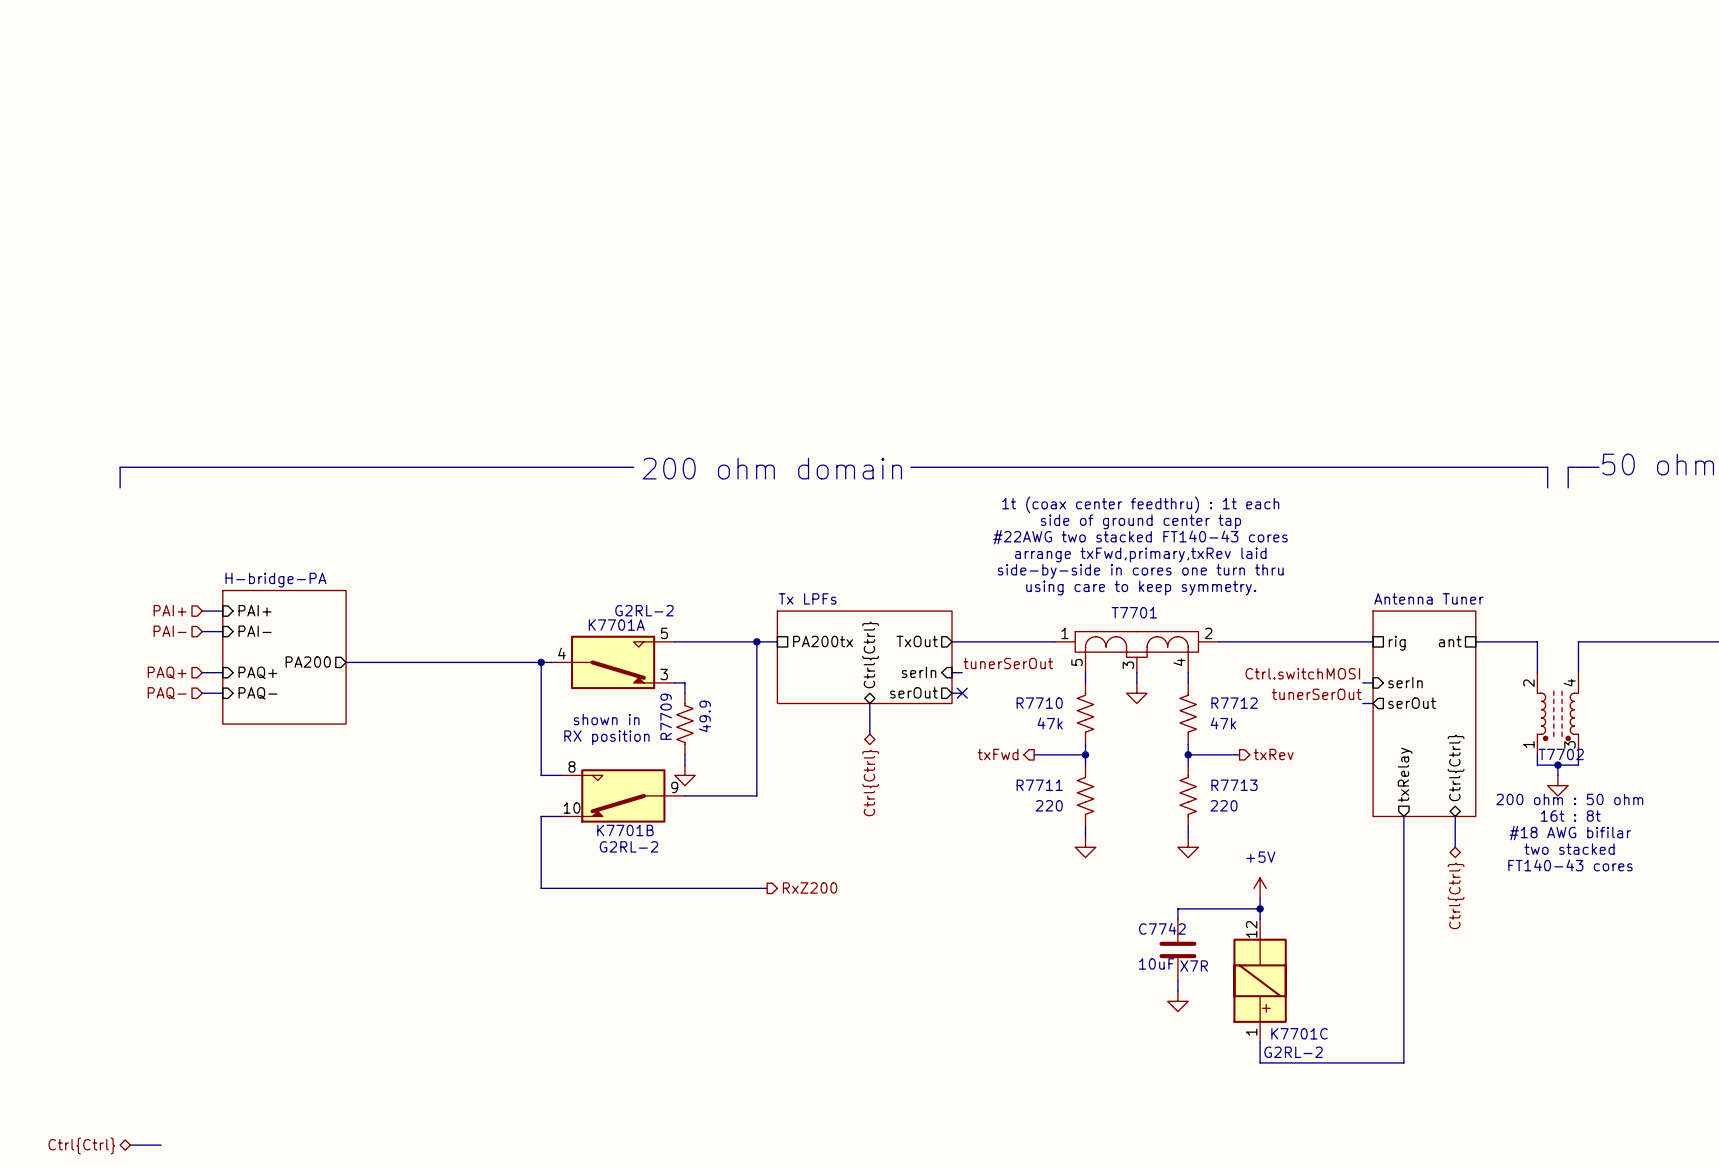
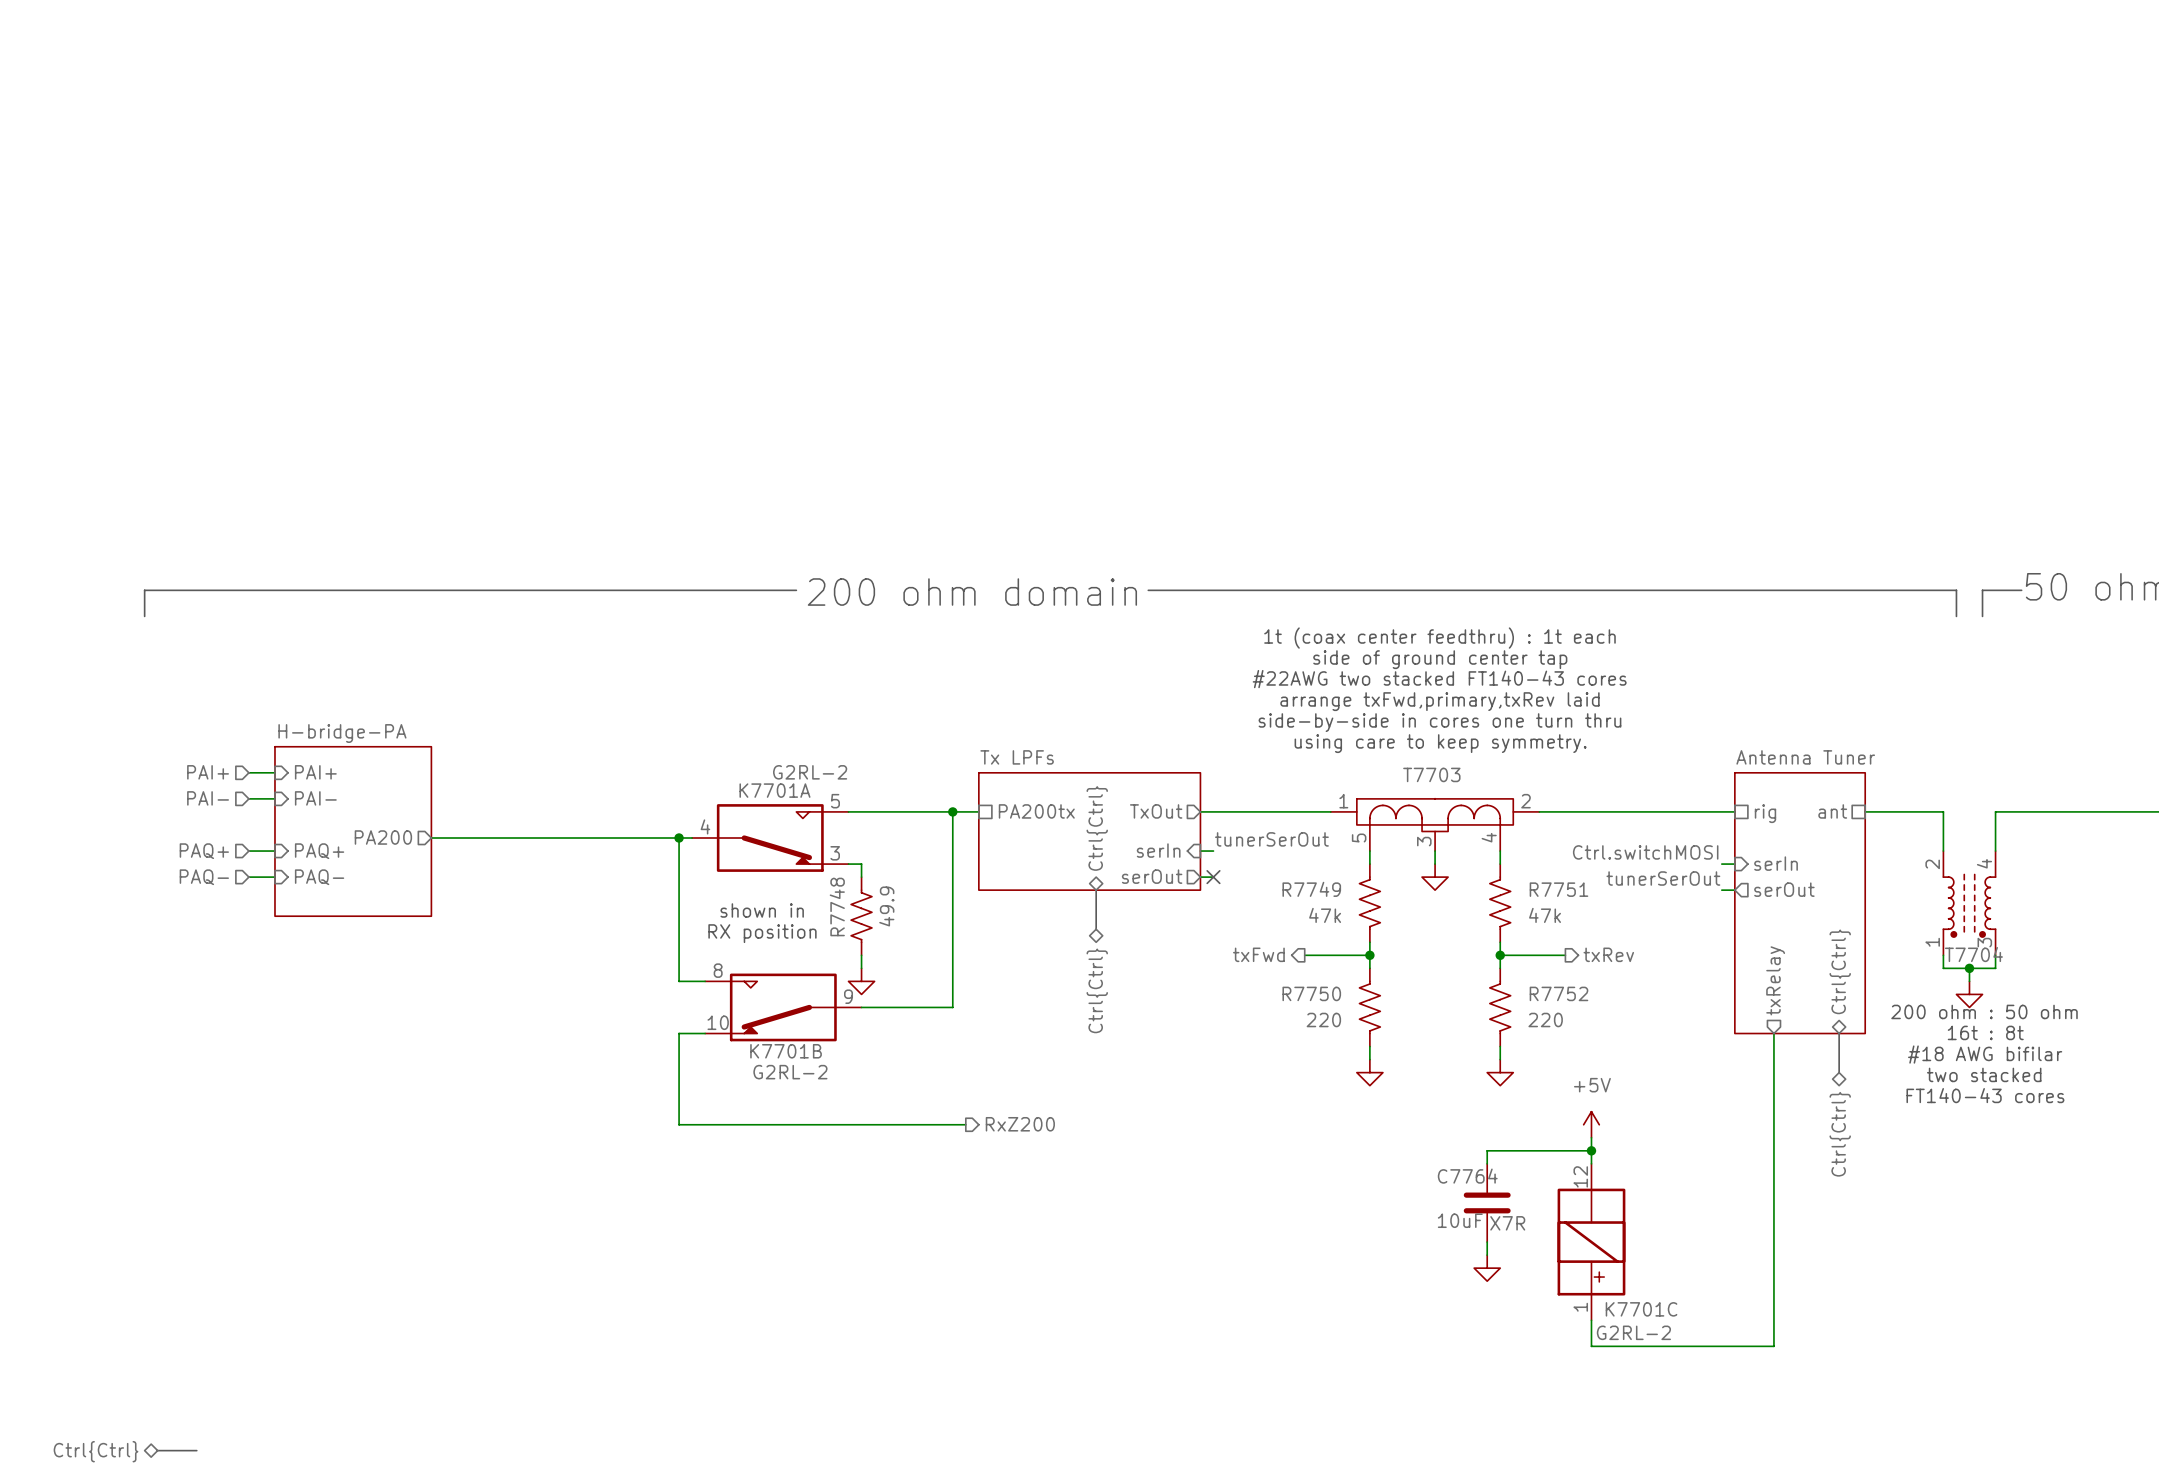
T7701 name: T7701 (1134, 612) -> T7703 (1431, 774)
R7710 name: R7710 (1039, 703) -> R7749 (1311, 889)
R7712 name: R7712 (1234, 703) -> R7751 (1558, 889)
R7709 name: R7709 (666, 716) -> R7748 (837, 906)
T7702 name: T7702 (1561, 754) -> T7704 (1973, 954)
R7711 name: R7711 (1039, 785) -> R7750 (1311, 993)
R7713 name: R7713 (1234, 785) -> R7752 (1558, 993)
C7742 name: C7742 (1162, 928) -> C7764 (1467, 1176)

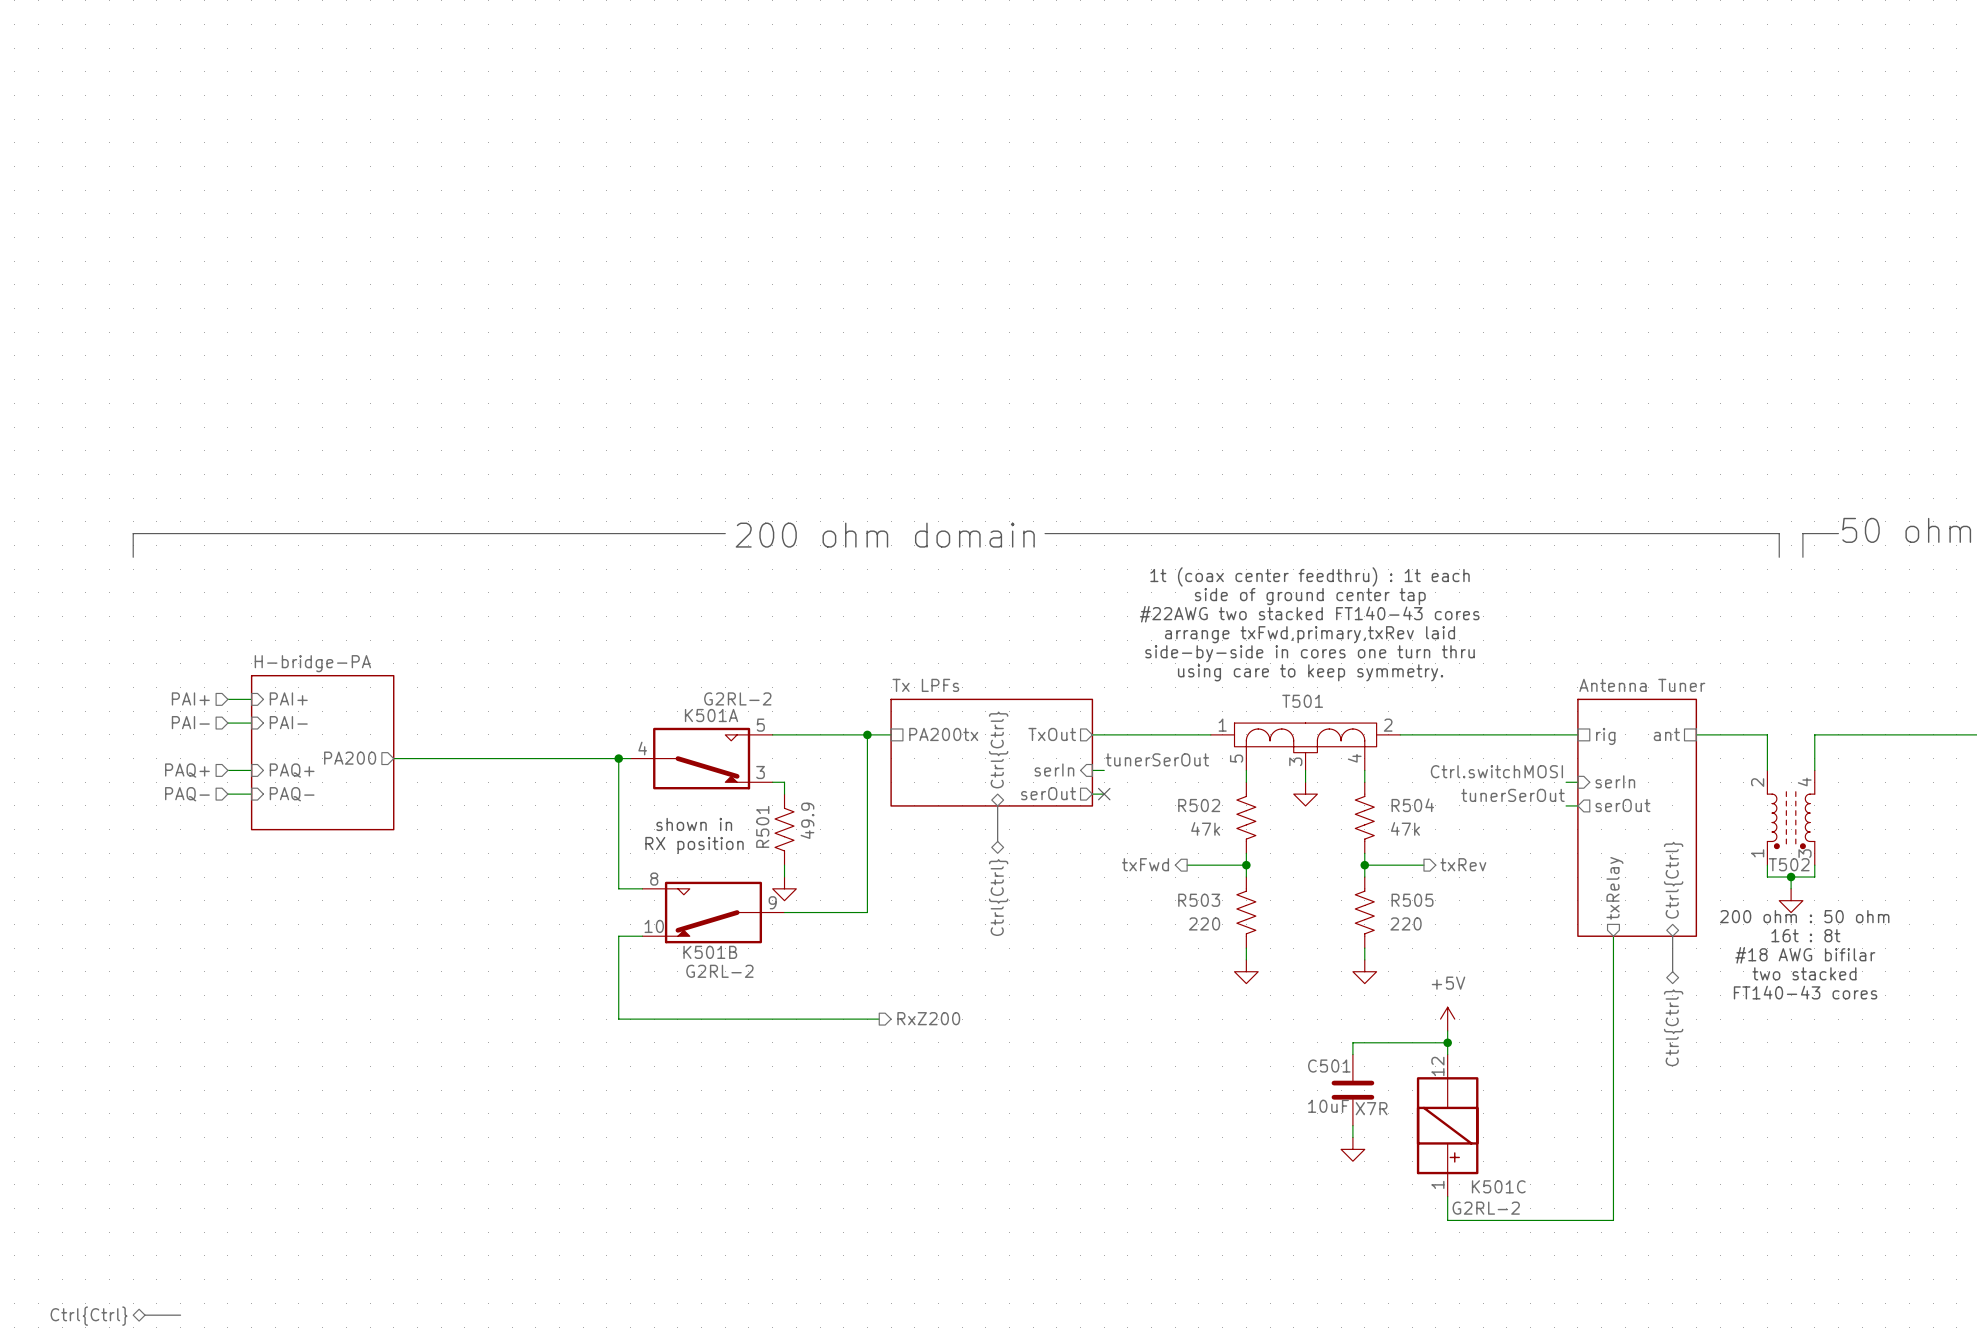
T7703 name: T7703 (1431, 774) -> T501 (1302, 701)
K7701A name: K7701A (774, 790) -> K501A (711, 715)
R7749 name: R7749 (1311, 889) -> R502 (1199, 805)
R7751 name: R7751 (1558, 889) -> R504 (1412, 805)
R7748 name: R7748 (837, 906) -> R501 (762, 826)
T7704 name: T7704 (1973, 954) -> T502 (1789, 864)
R7750 name: R7750 (1311, 993) -> R503 (1199, 900)
R7752 name: R7752 (1558, 993) -> R505 (1412, 900)
K7701B name: K7701B (786, 1051) -> K501B (710, 952)
C7764 name: C7764 (1467, 1176) -> C501 (1329, 1066)
K7701C name: K7701C (1641, 1309) -> K501C (1498, 1186)

